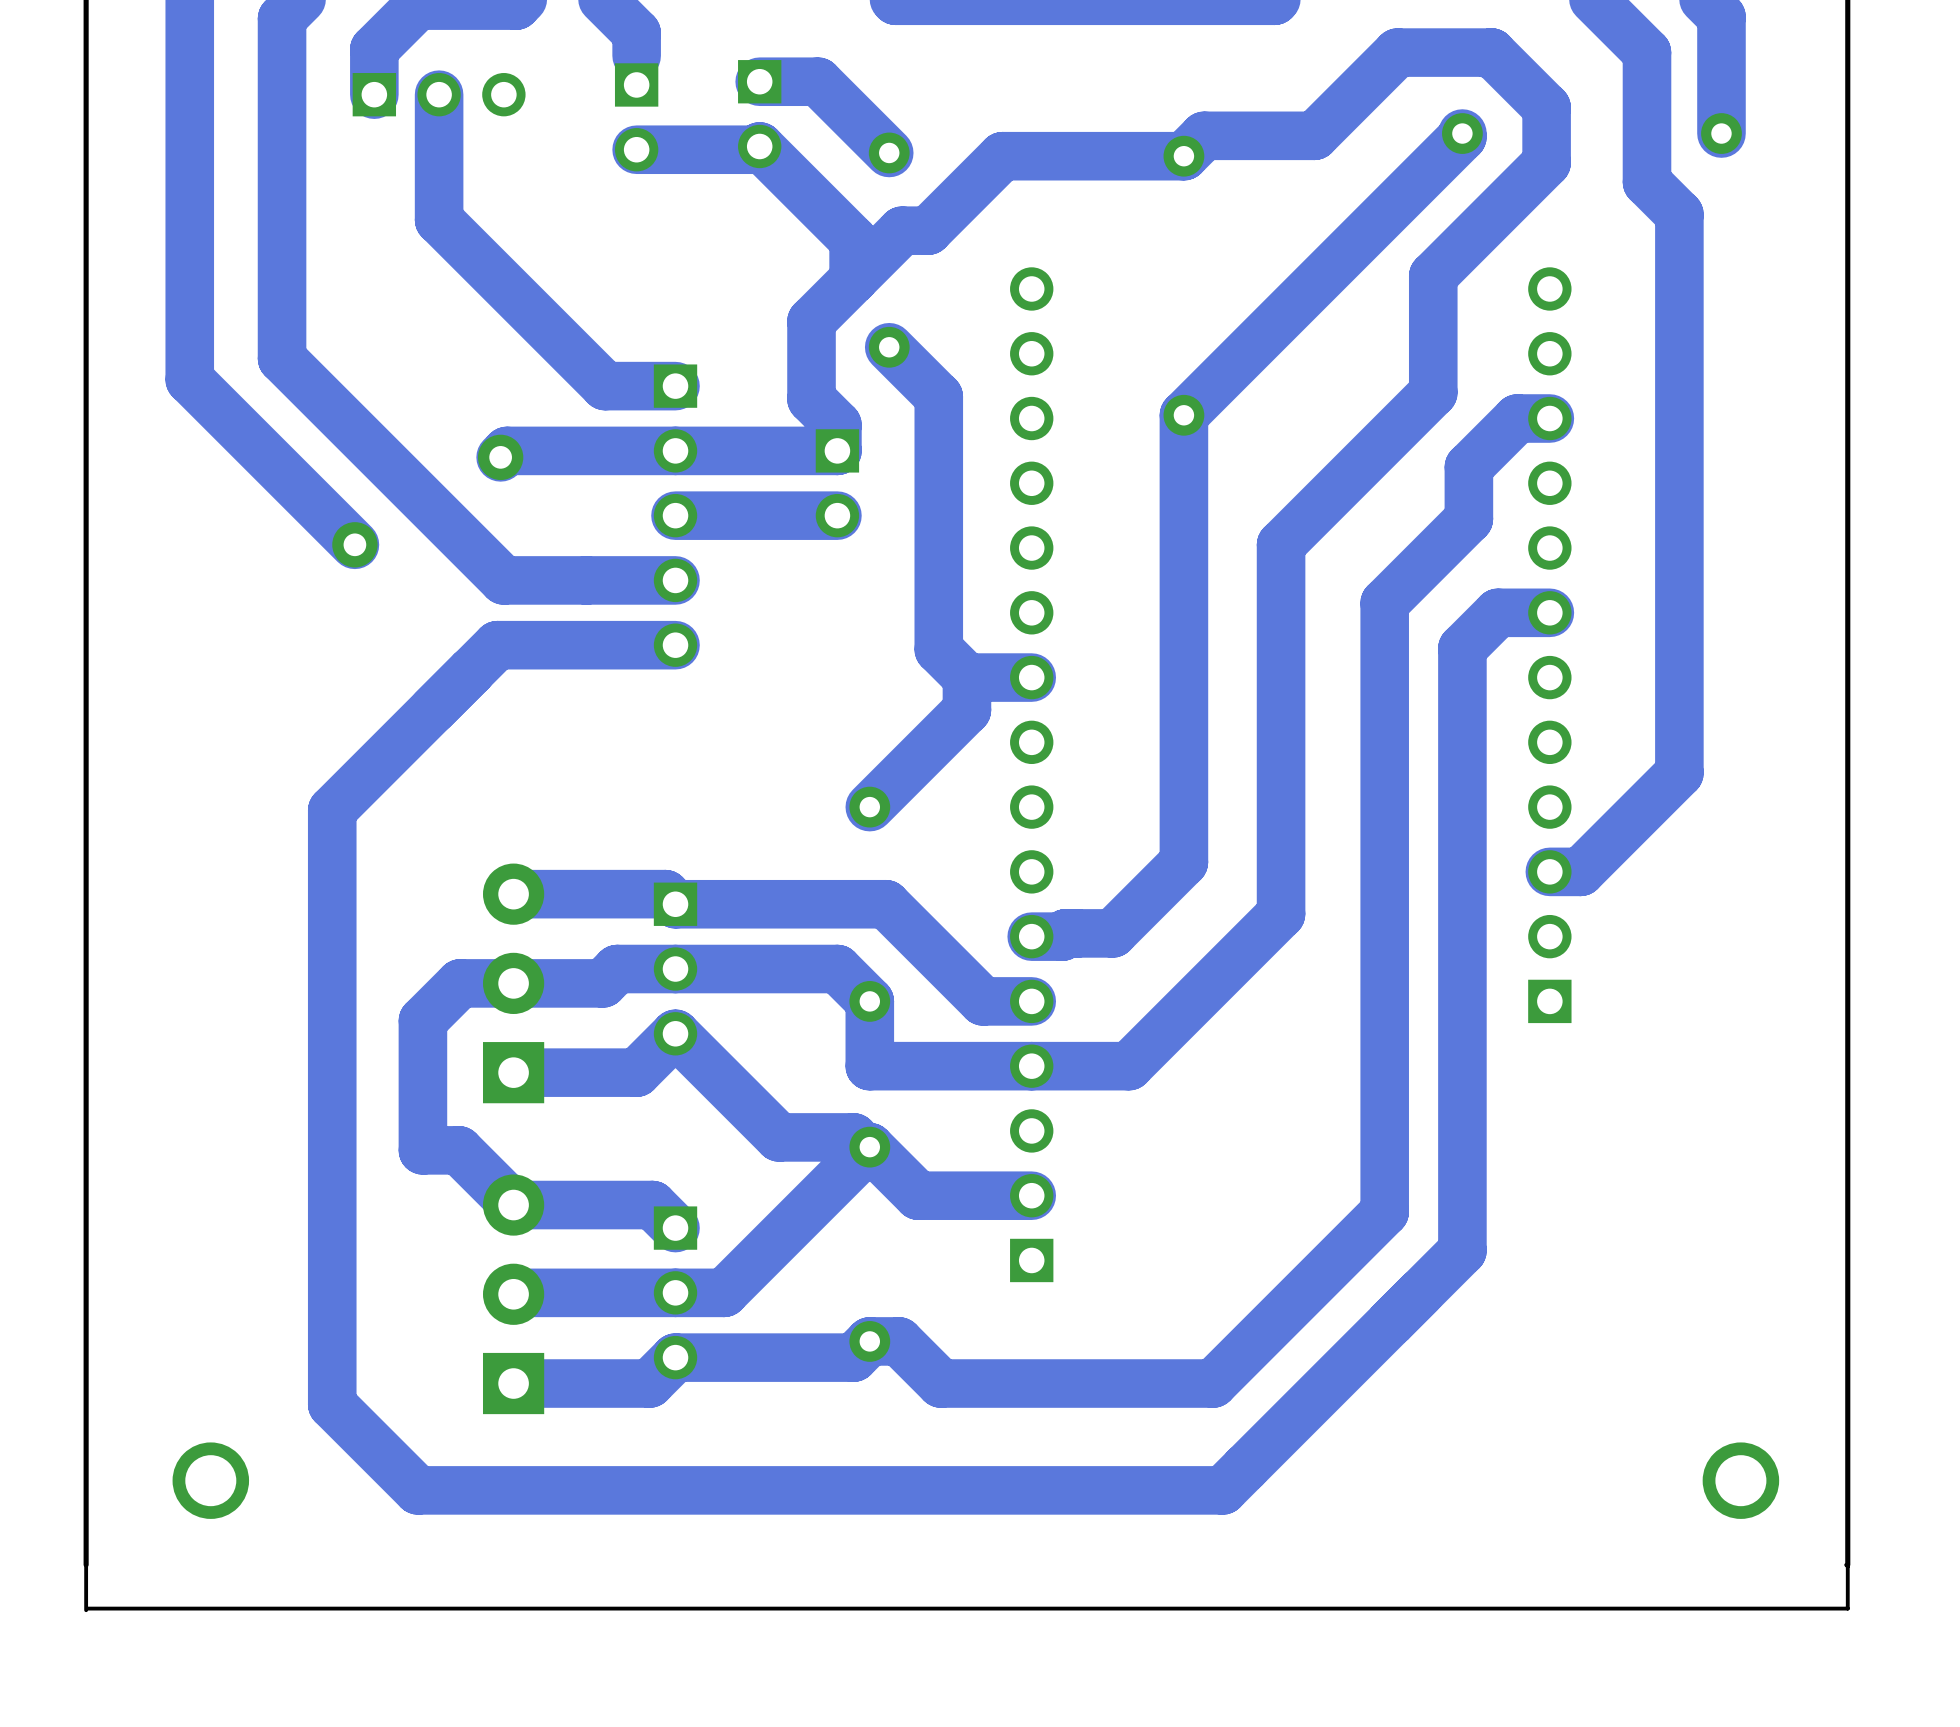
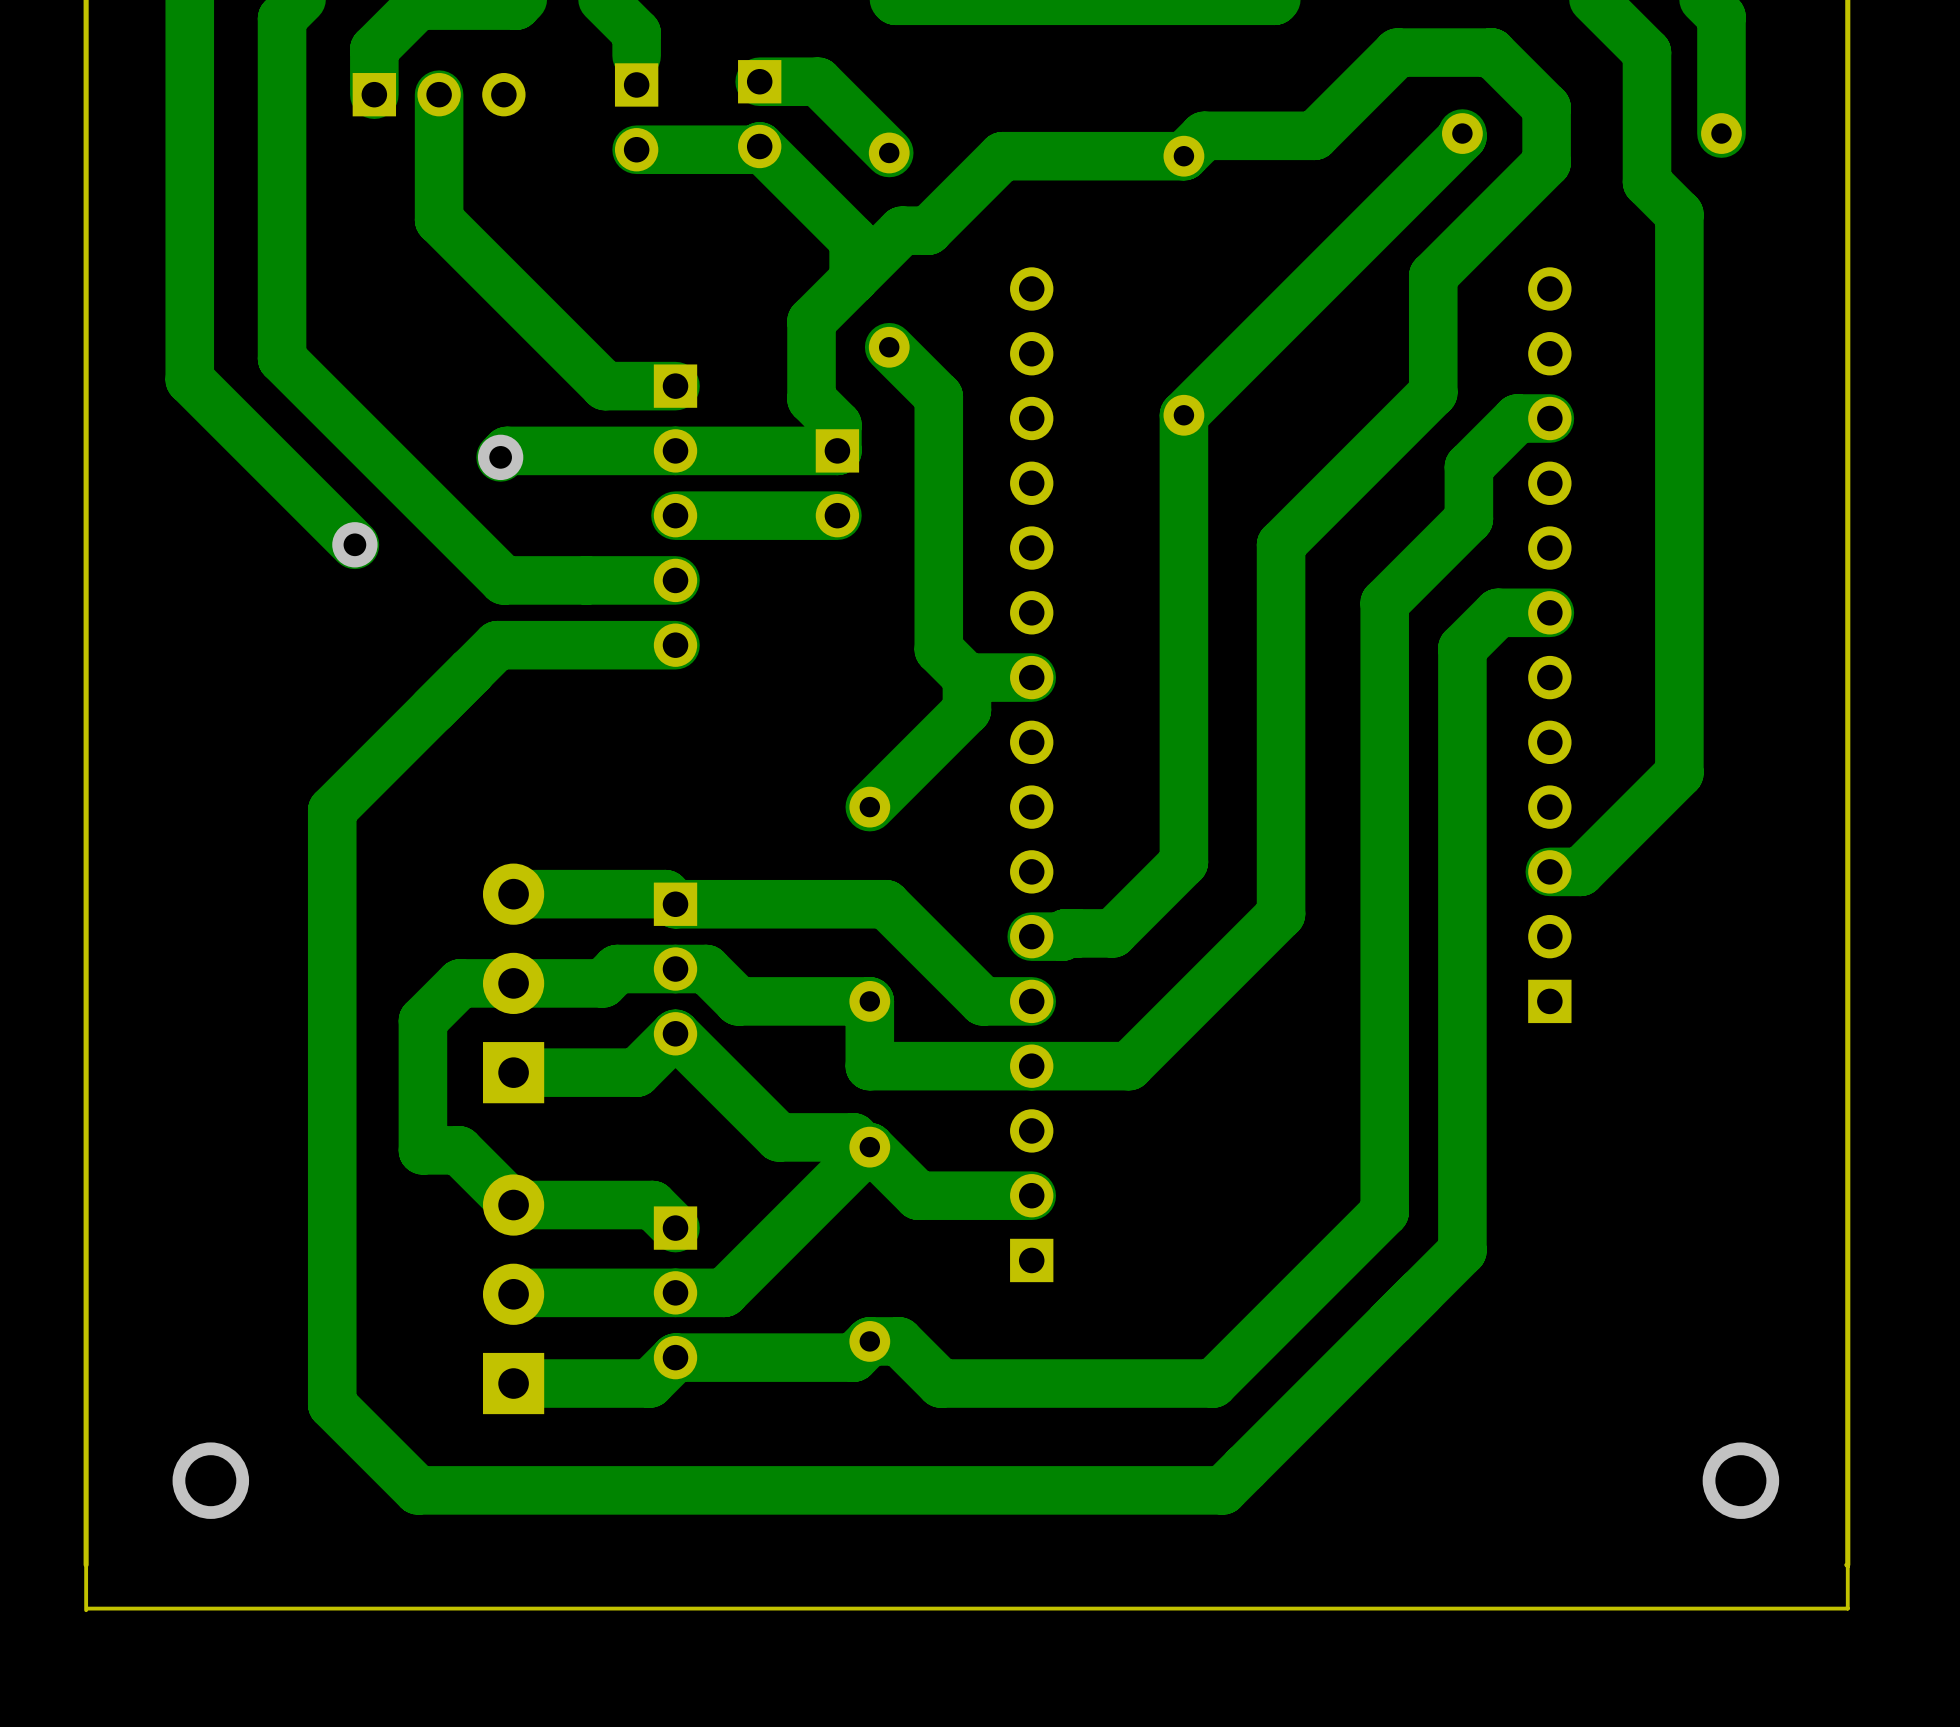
track: (706, 969) (837, 969) (869, 1001) -> (706, 969) (738, 1001) (869, 1001)

